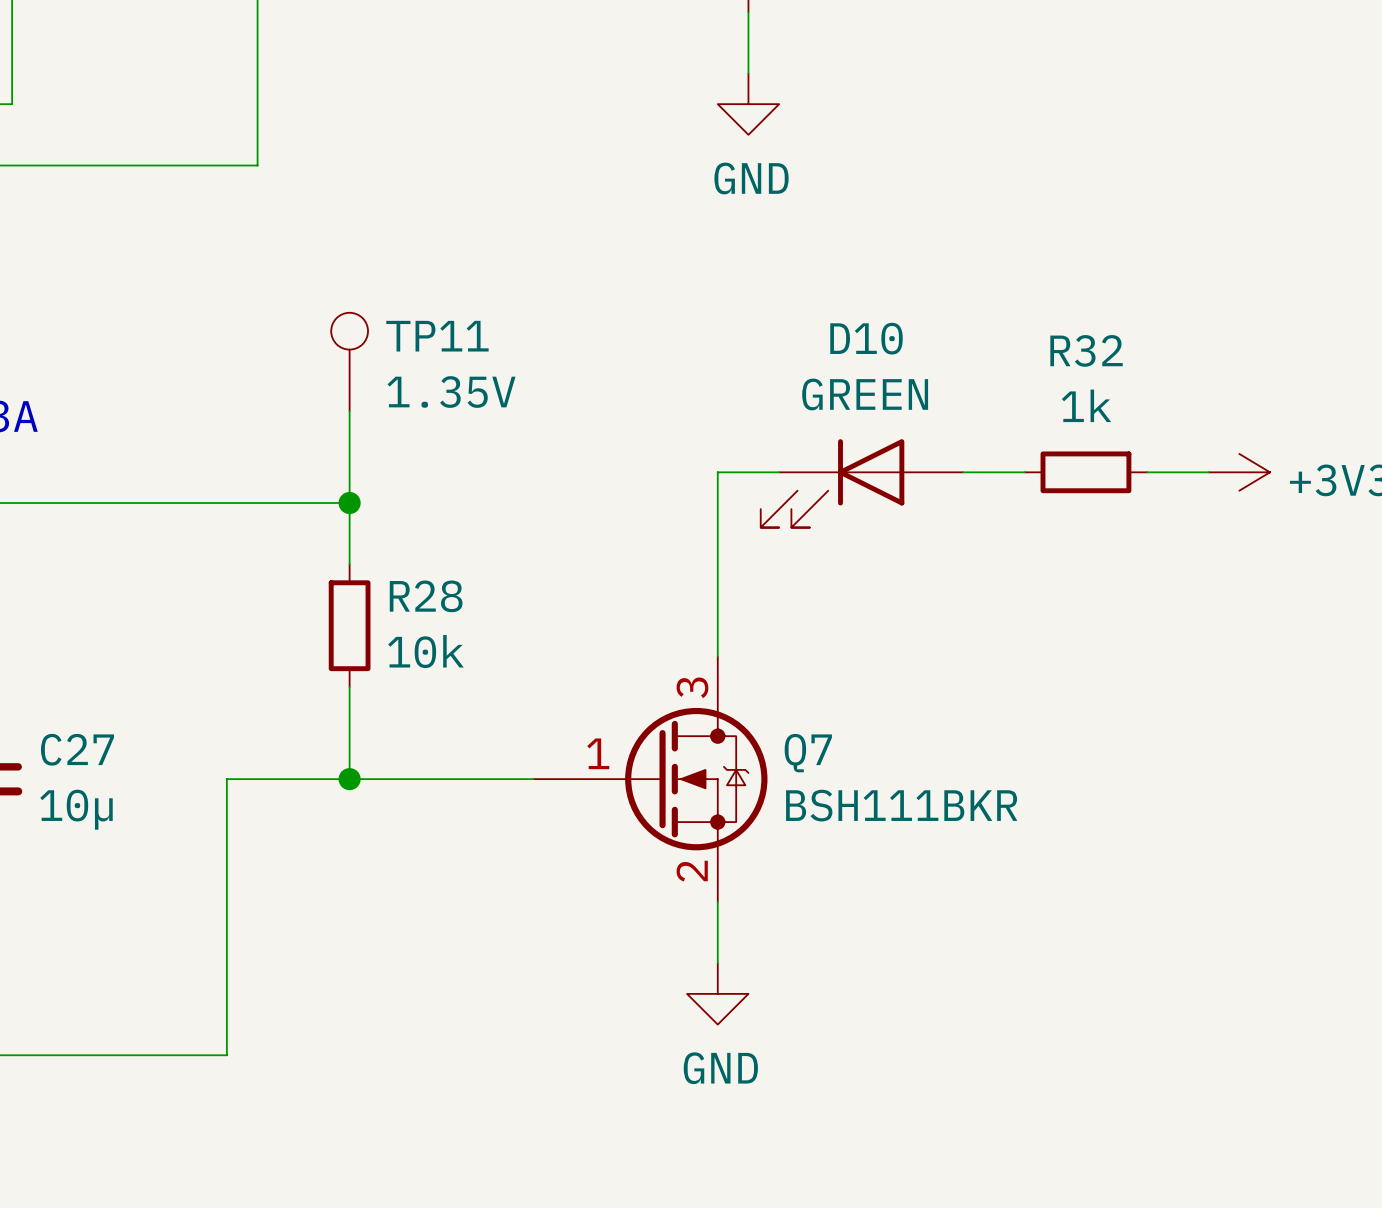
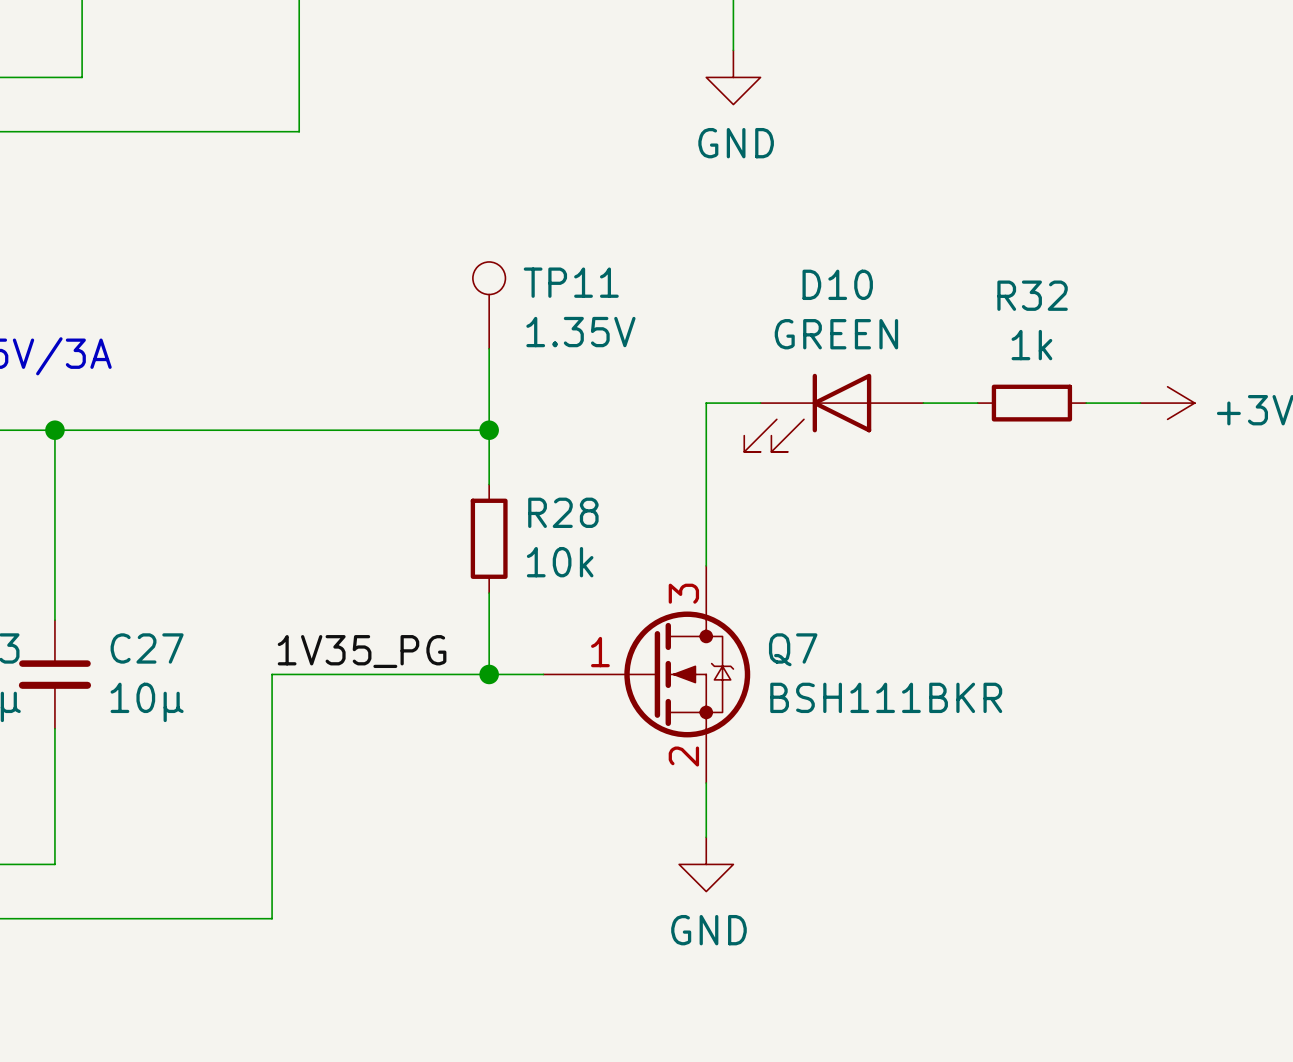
TP11 position: (349, 361) -> (489, 305)
wire: (349, 410) (349, 564) -> (489, 348) (489, 484)
wire: none -> (380, 430) (489, 430)
junction position: (349, 503) -> (489, 430)
R28 position: (349, 625) -> (489, 538)
wire: (349, 687) (349, 779) -> (489, 593) (489, 674)
label: none -> 1V35_PG (362, 651)
junction position: (349, 779) -> (489, 674)

